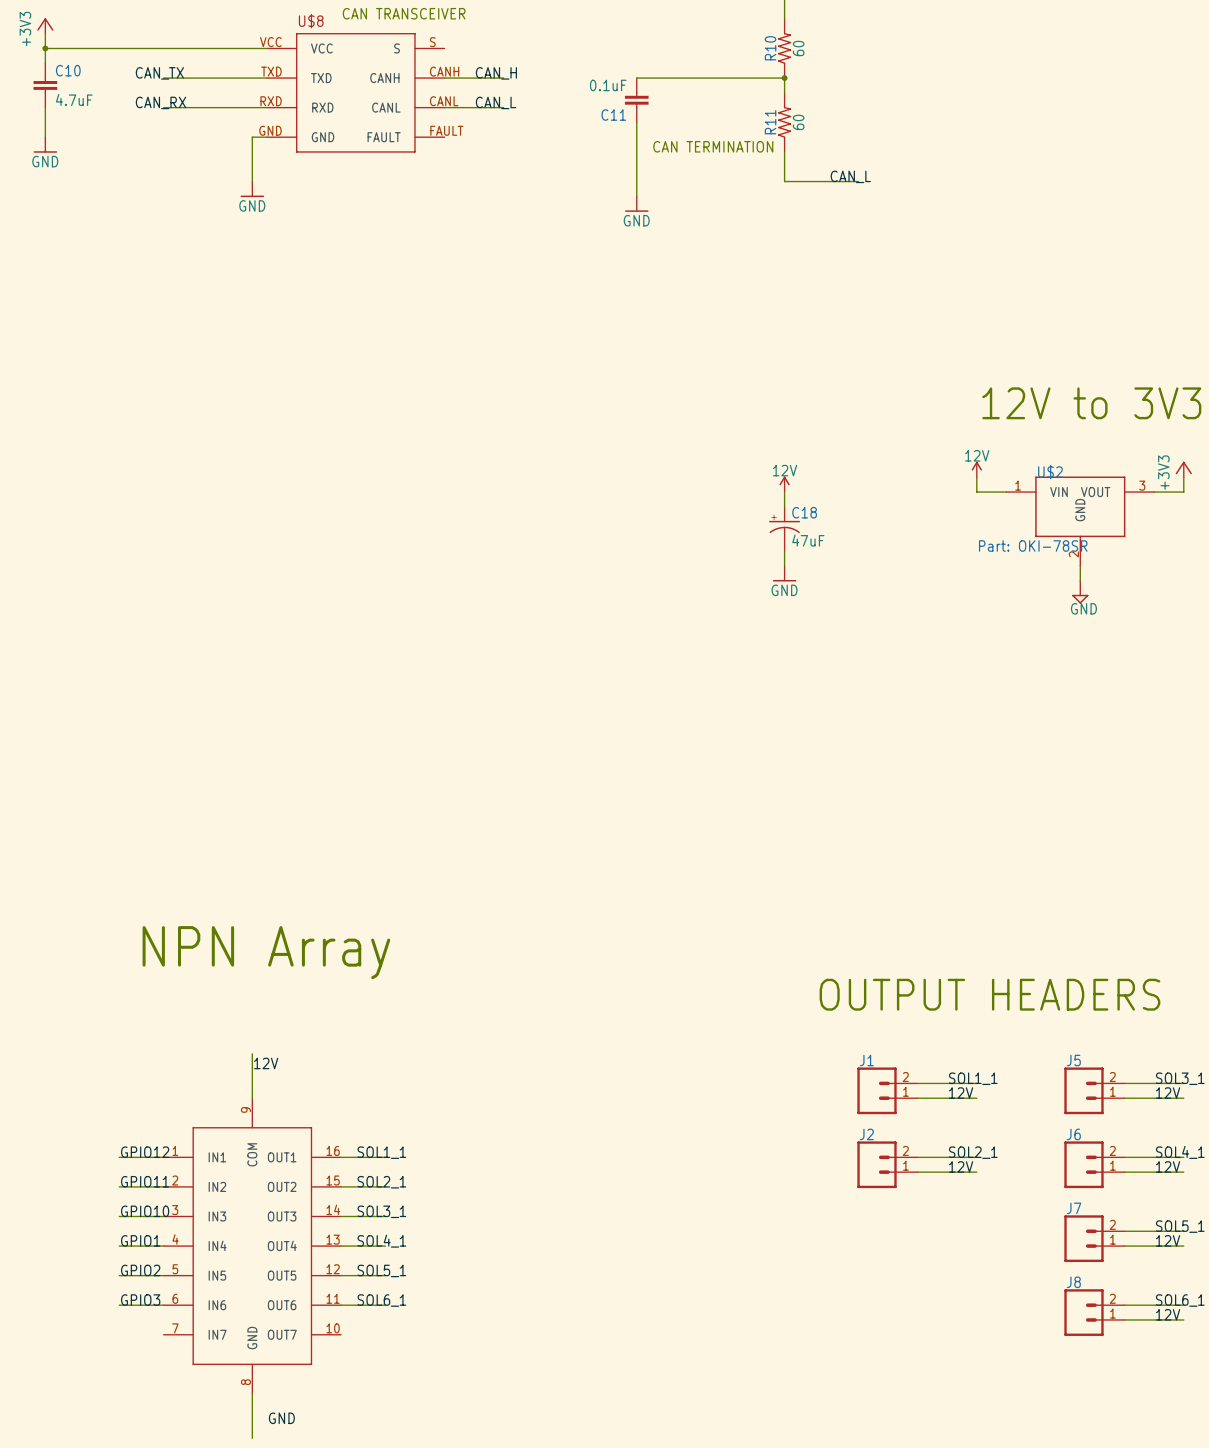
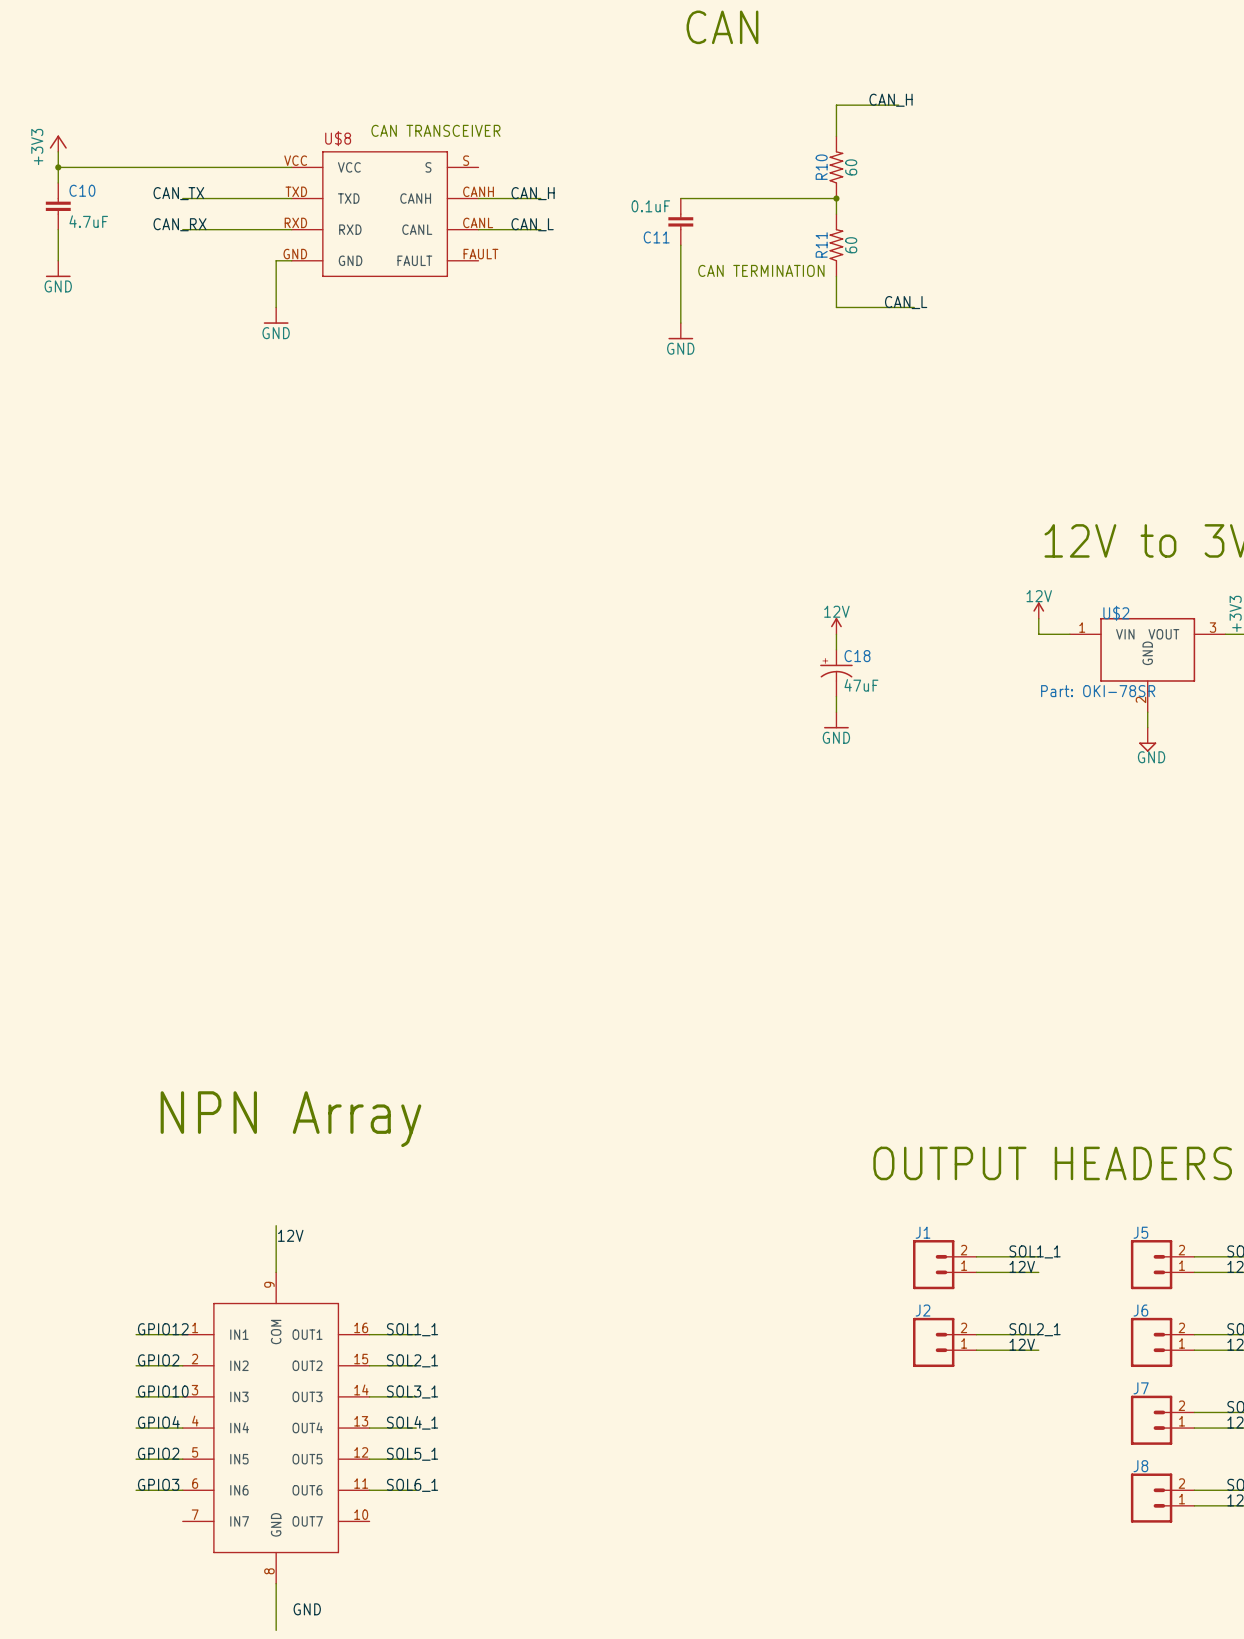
label: GPIO11 (145, 1181) -> GPIO2 (158, 1360)
label: GPIO1 (140, 1240) -> GPIO4 (158, 1422)

